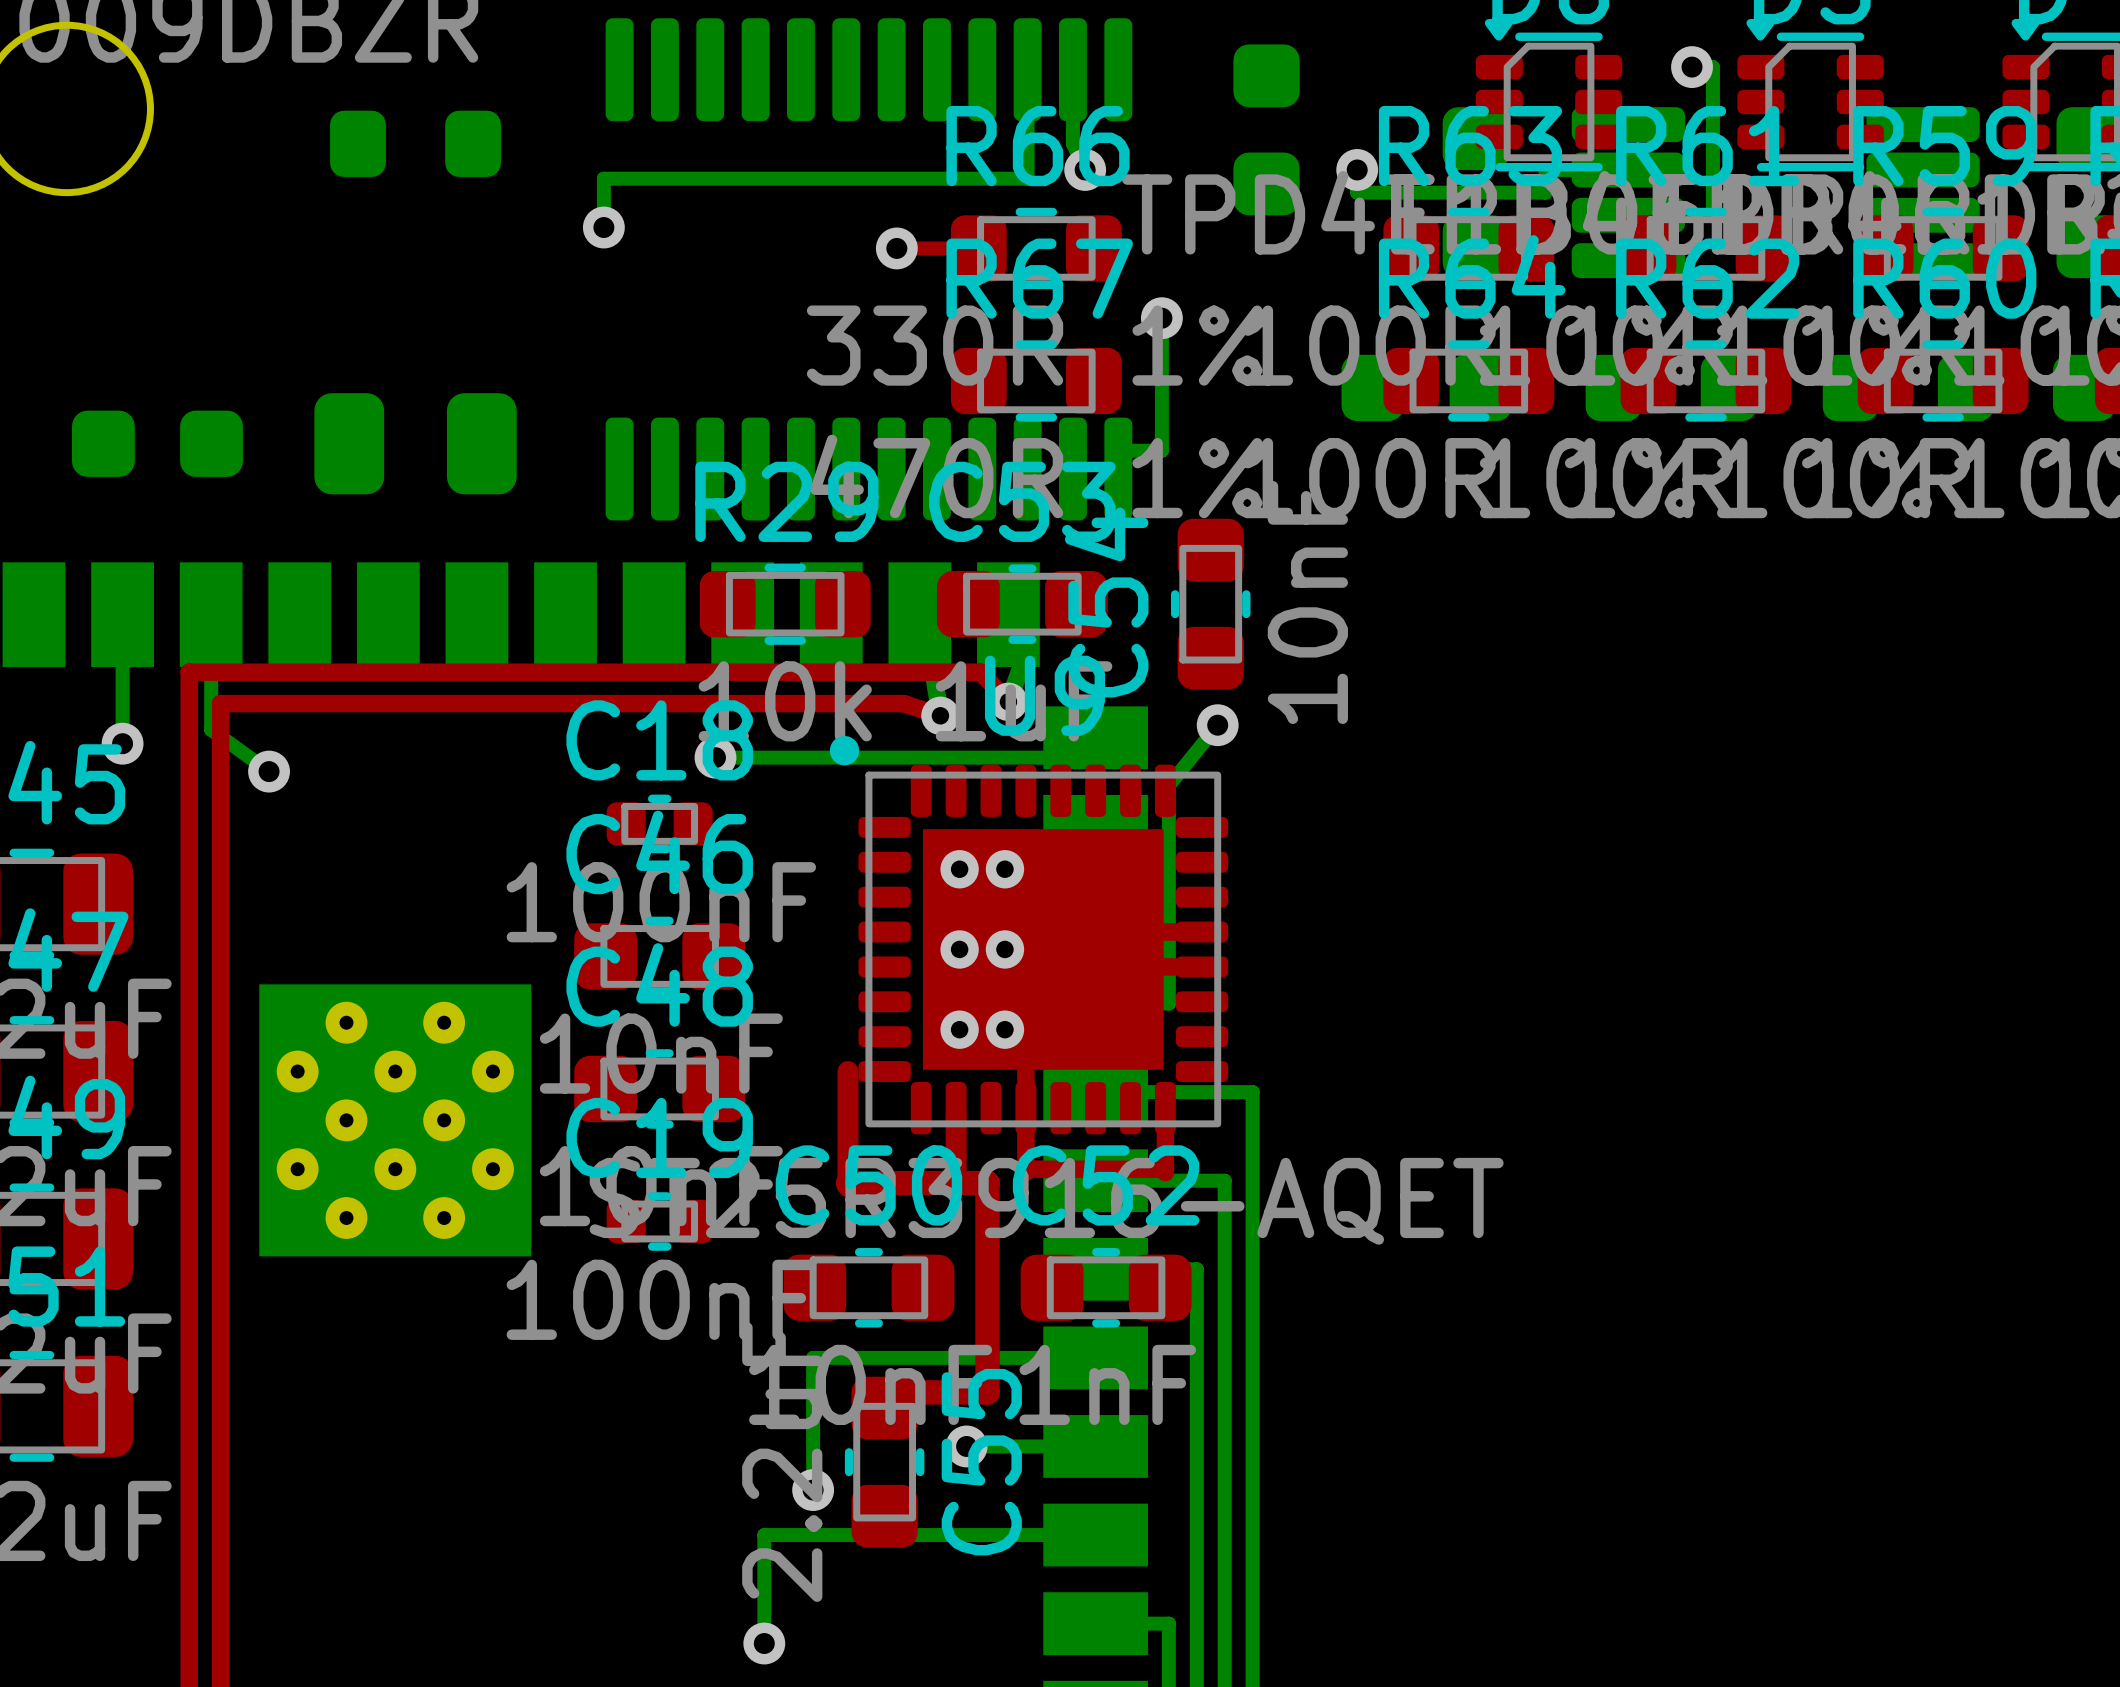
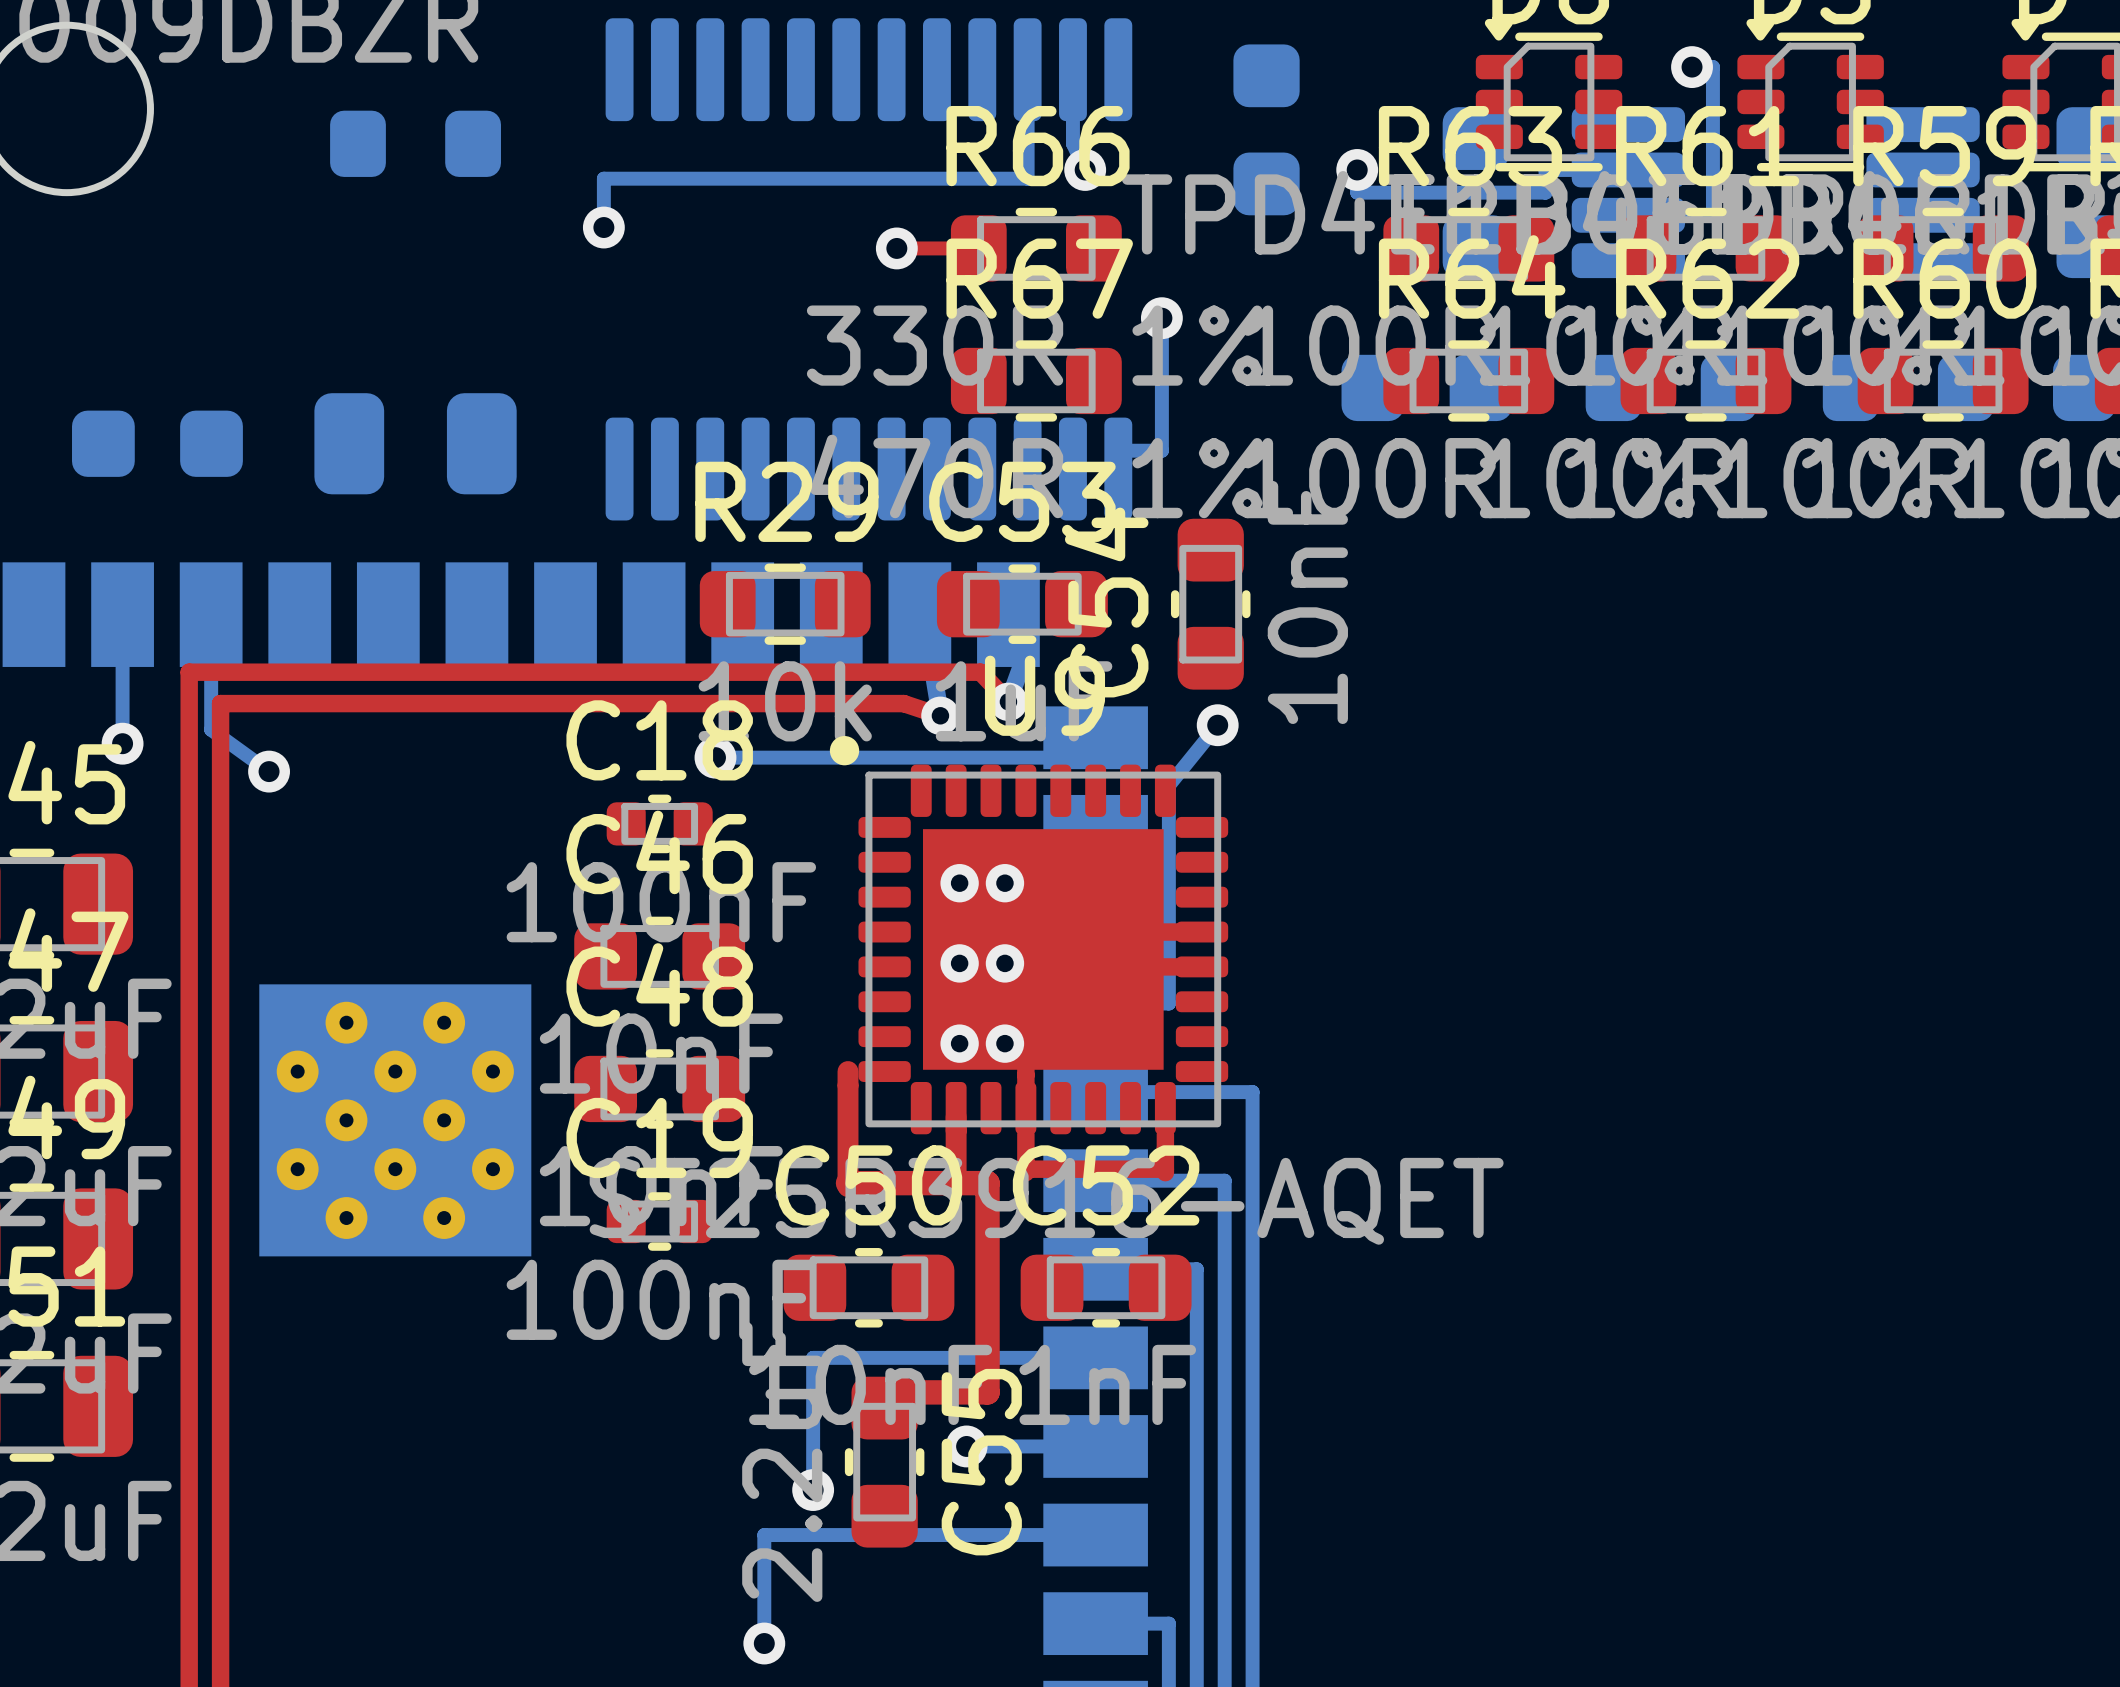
via position: (959, 869) -> (959, 883)
via position: (1004, 869) -> (1004, 883)
via position: (959, 949) -> (959, 963)
via position: (1004, 949) -> (1004, 963)
via position: (959, 1029) -> (959, 1043)
via position: (1004, 1029) -> (1004, 1043)

